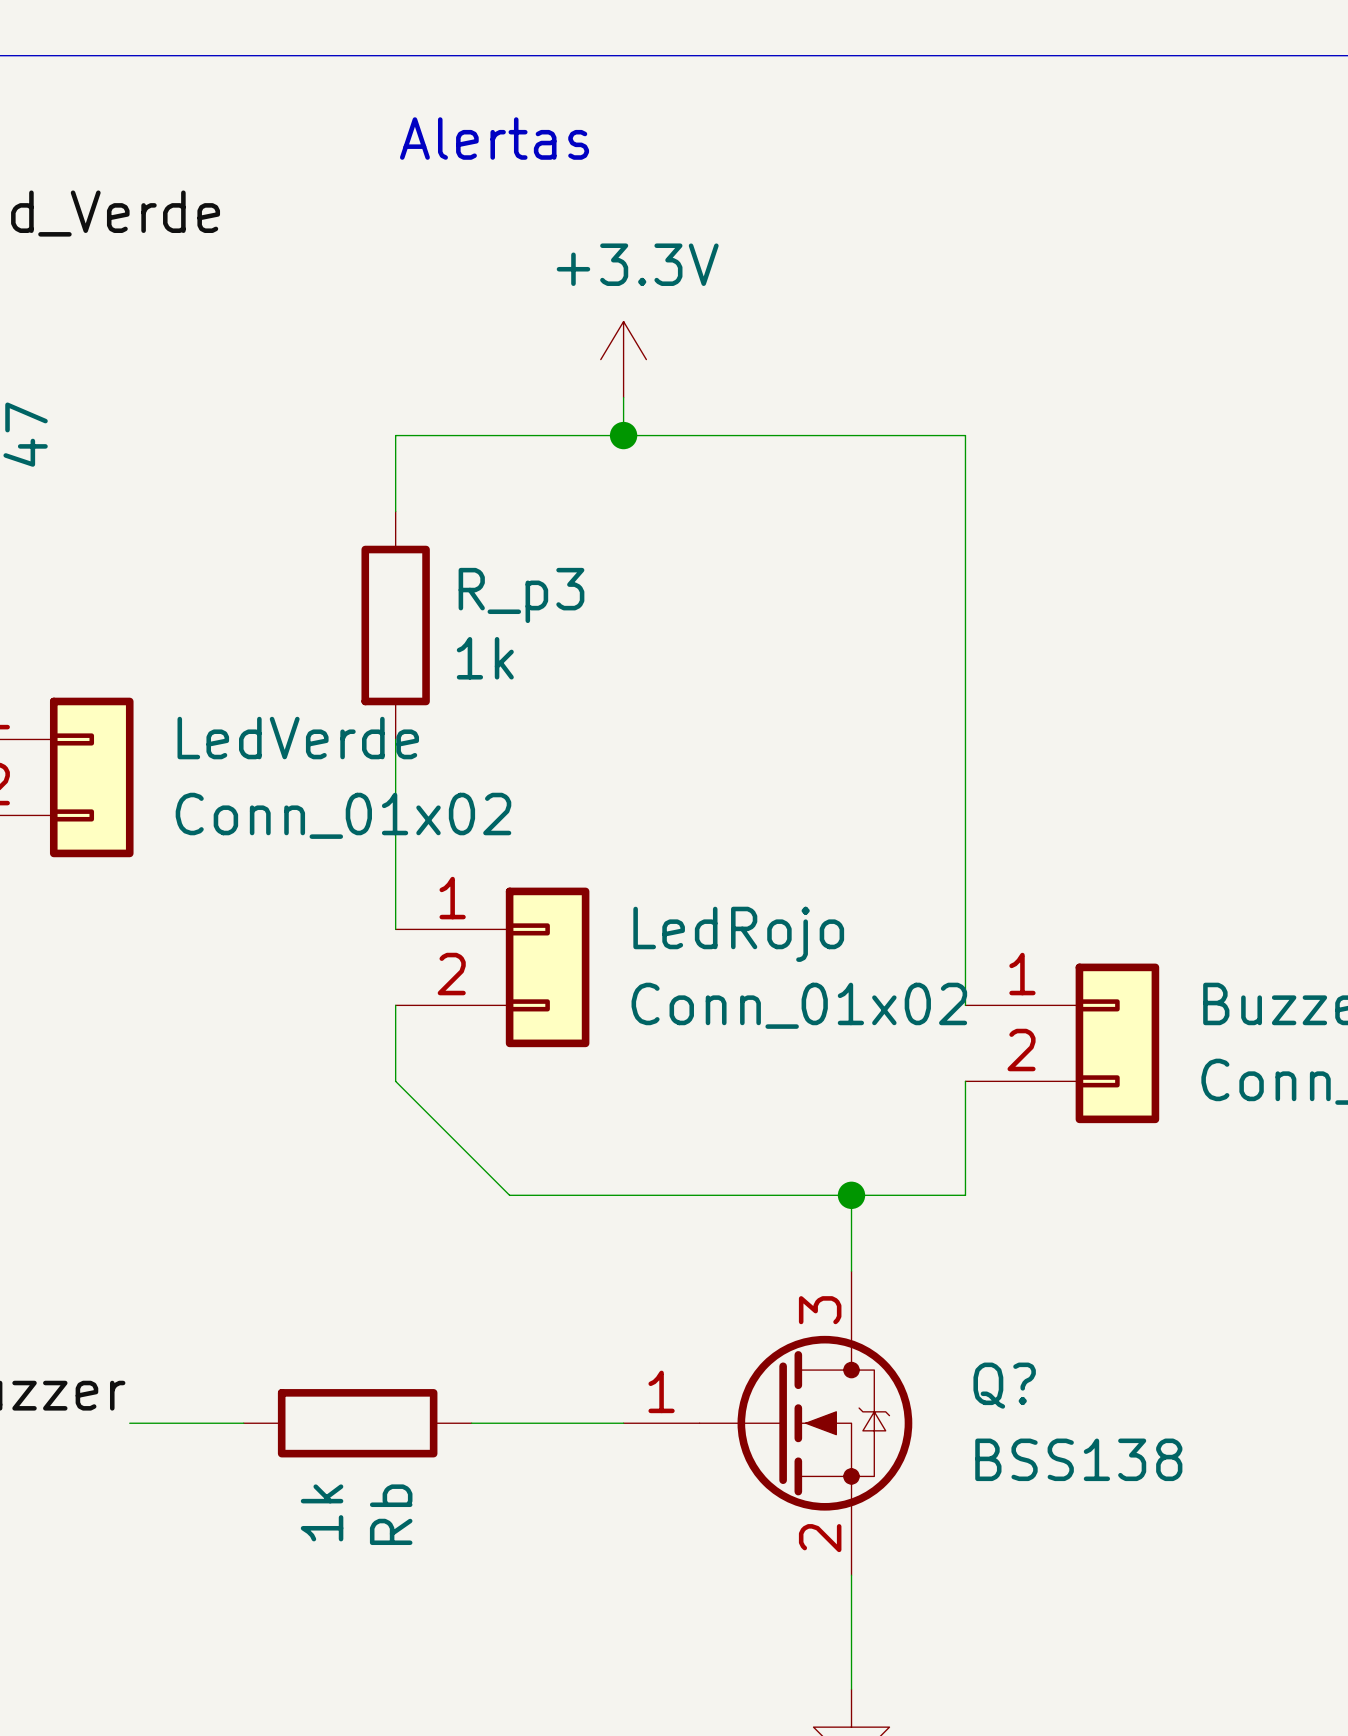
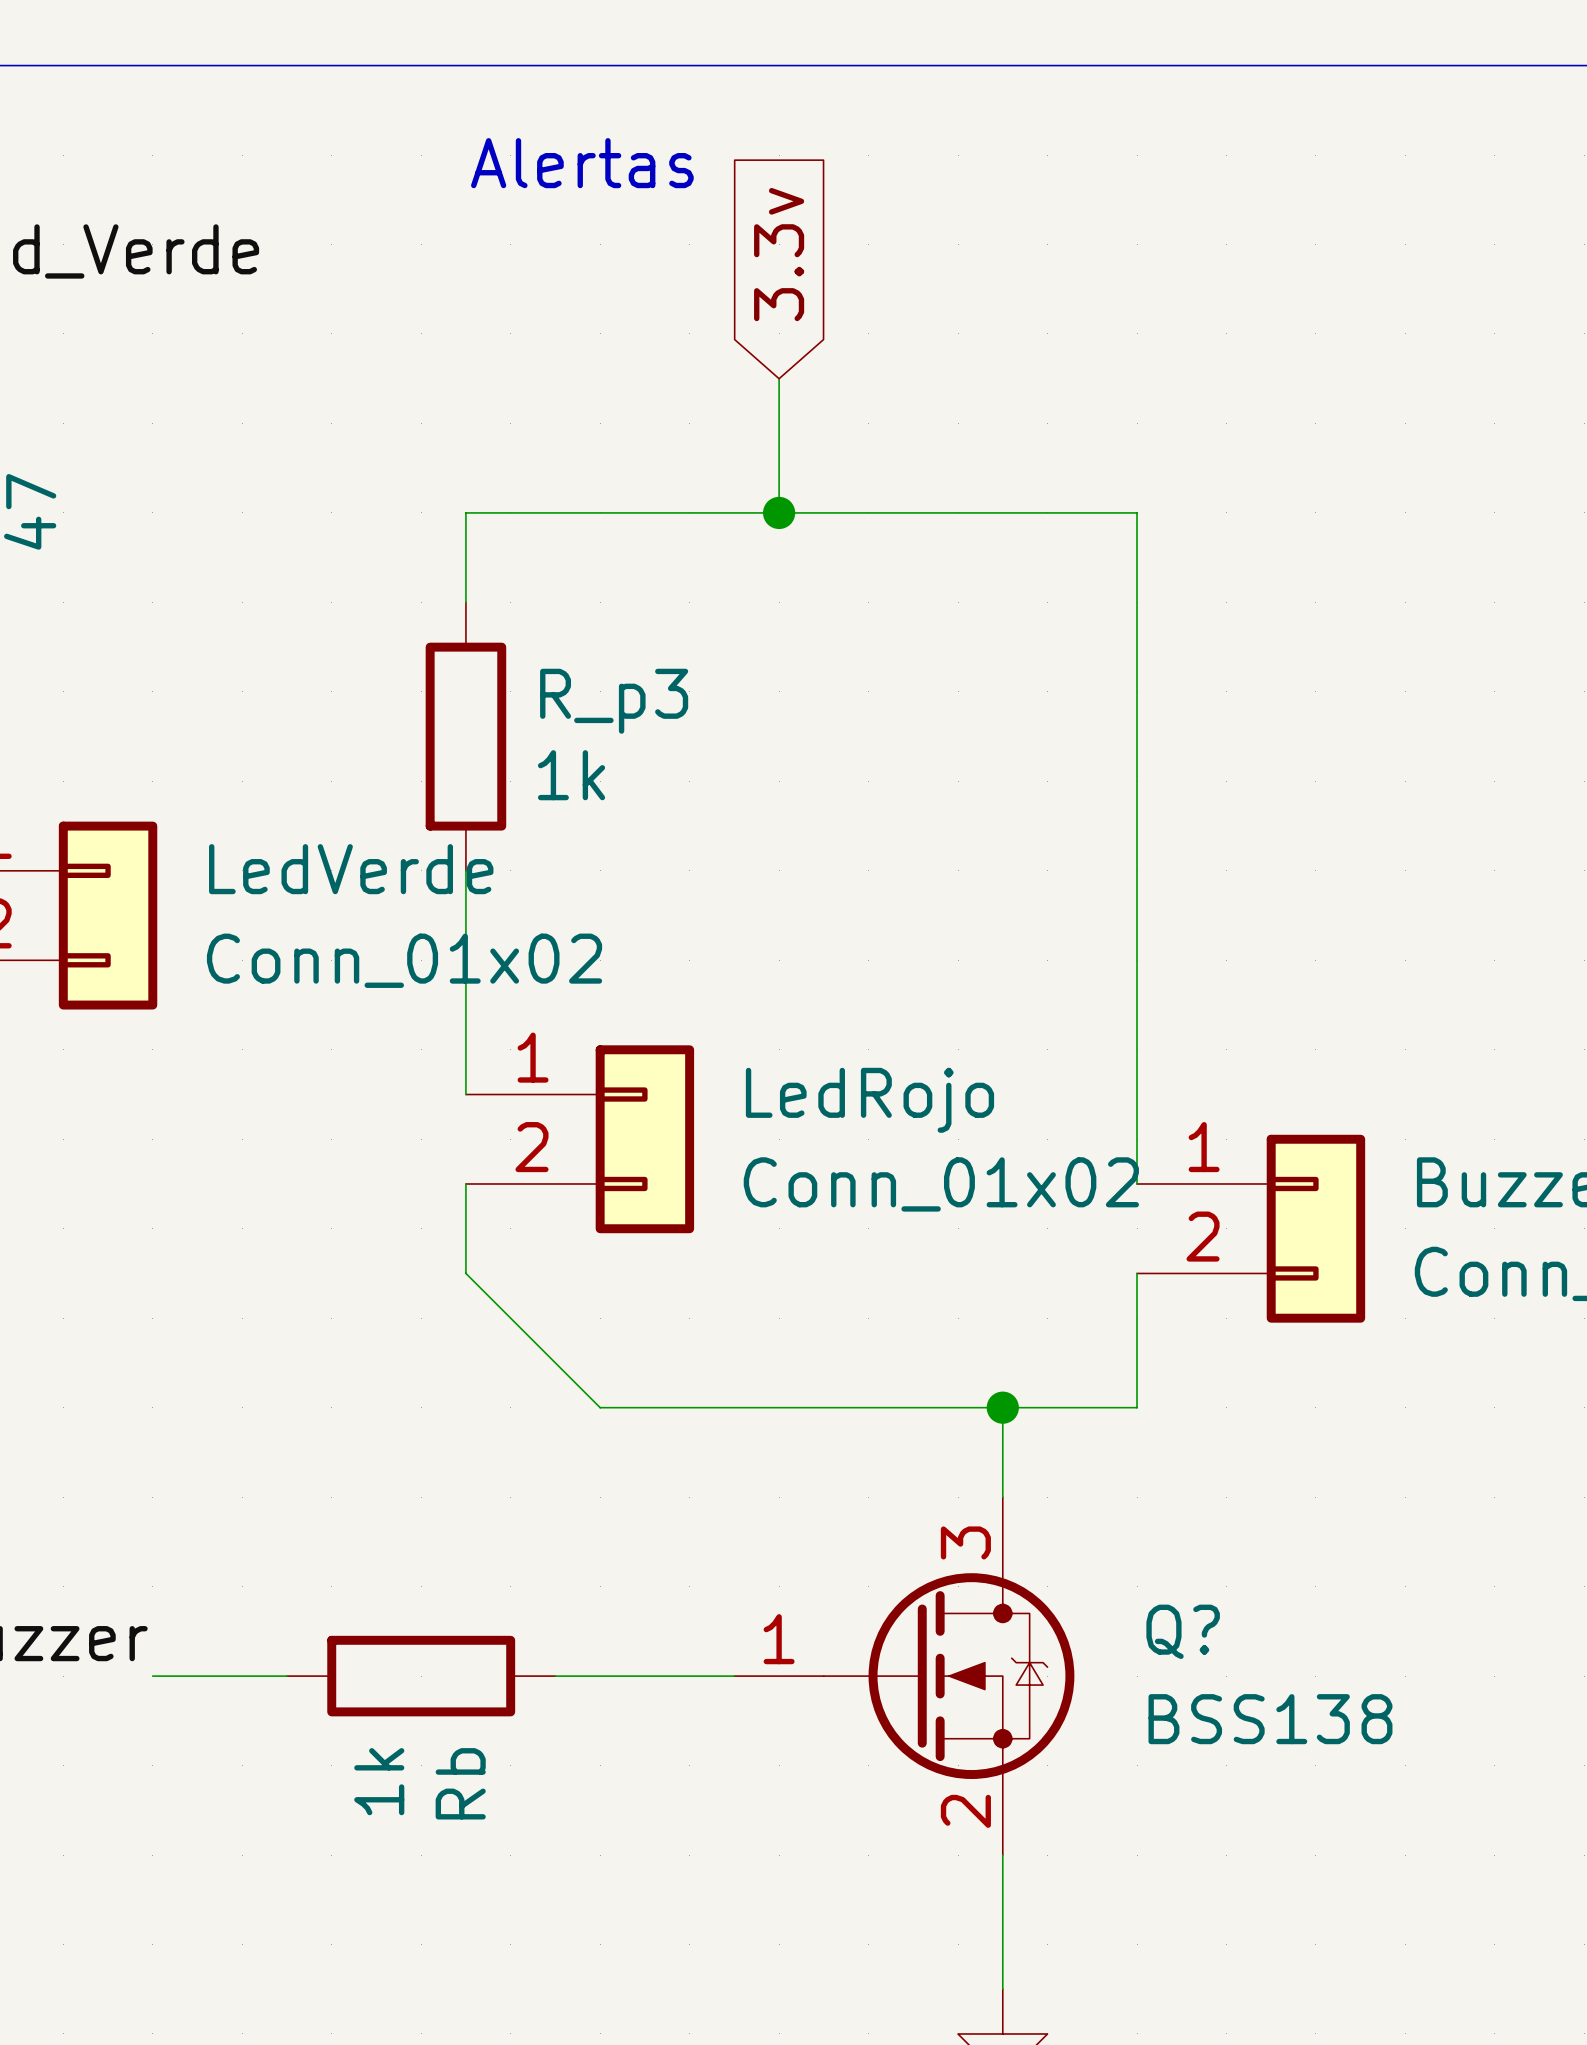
global label: none -> 3.3v (779, 254)
wire: none -> (779, 378) (779, 512)
power symbol: +3.3V (623, 359) -> none
wire: (623, 397) (623, 435) -> none
junction position: (623, 435) -> (779, 512)

